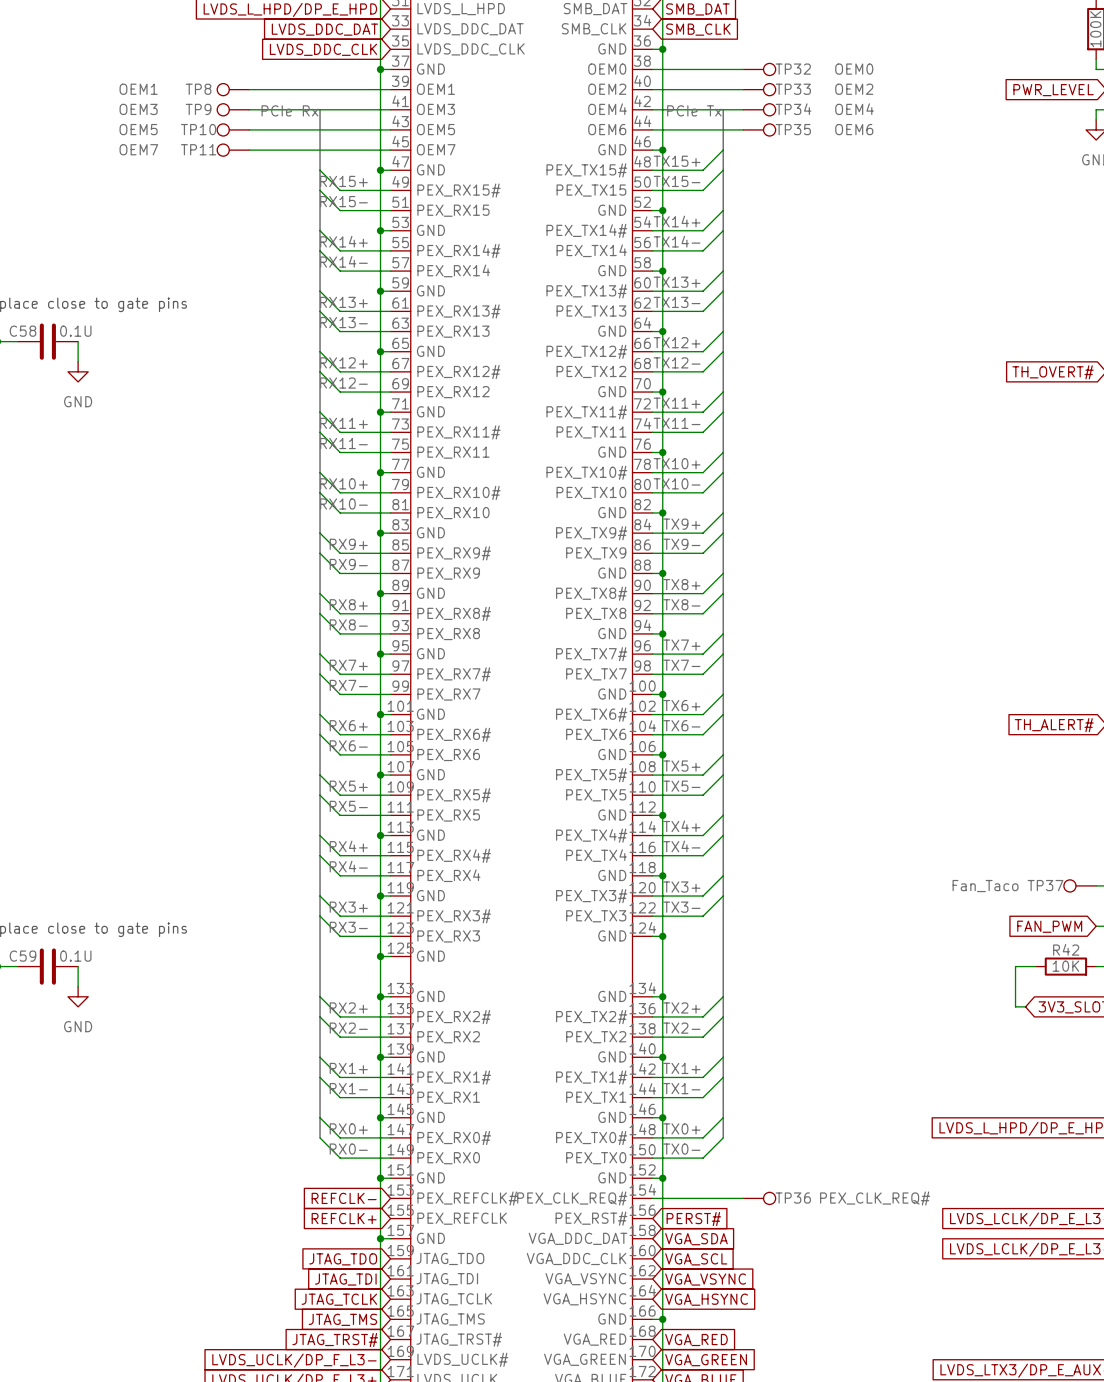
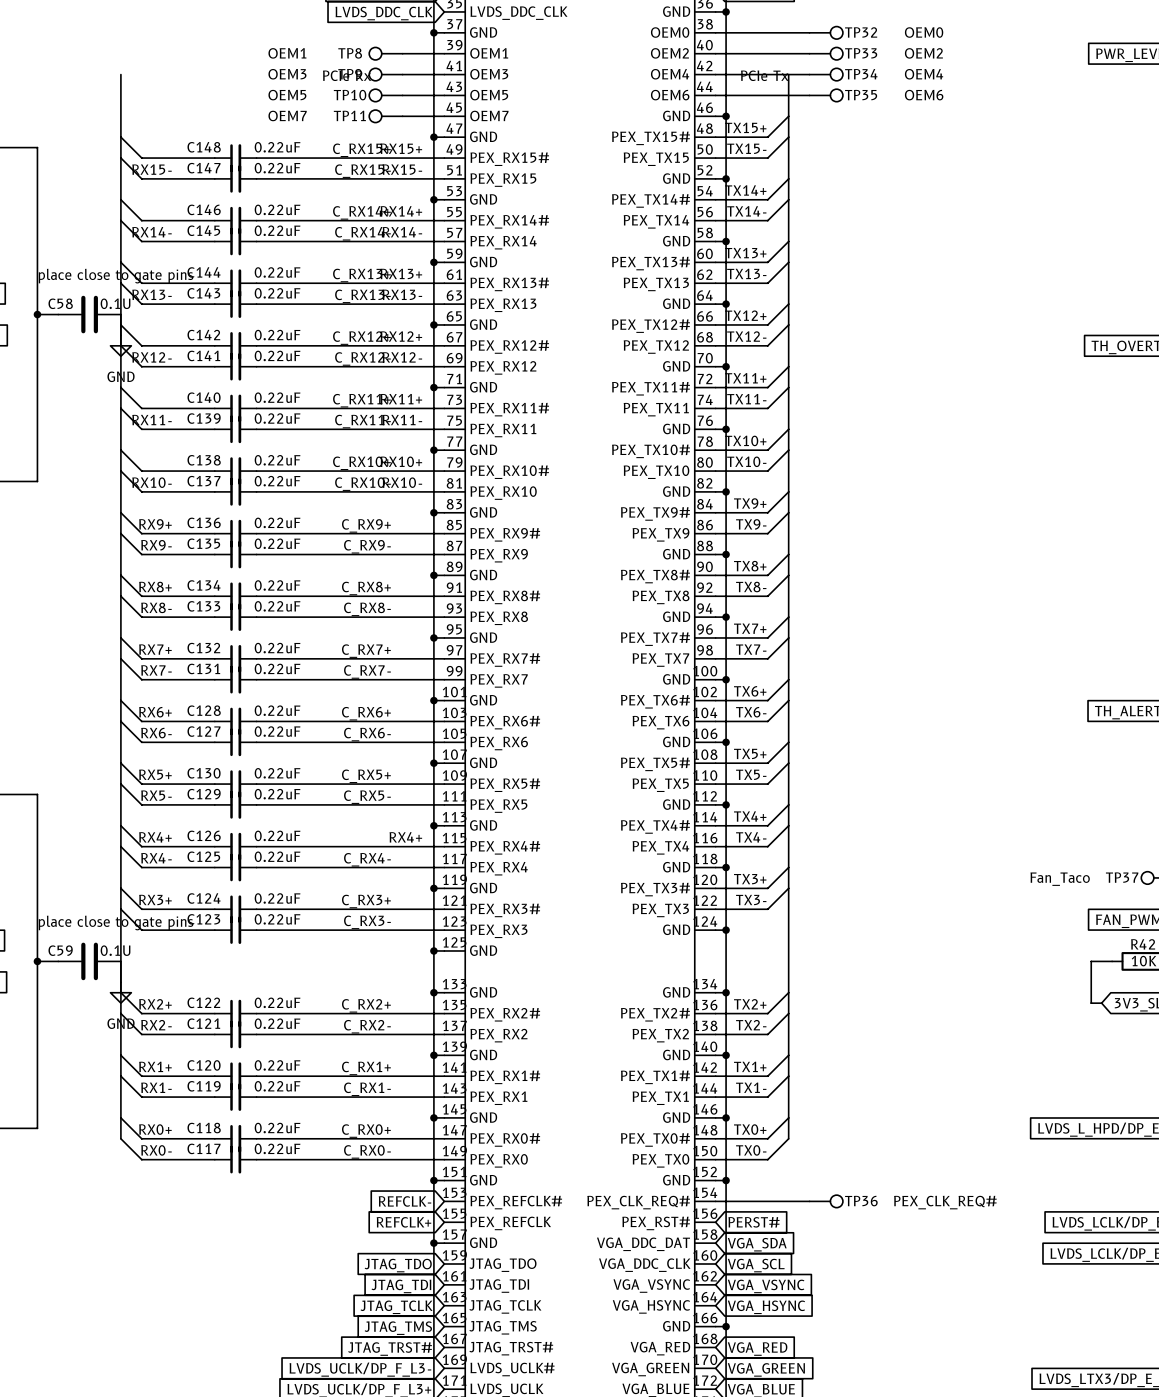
TP8 position: (233, 89) -> (385, 53)
wire: (249, 89) (350, 89) -> none
bus: none -> (120, 74) (120, 1138)
TP9 position: (233, 109) -> (385, 74)
wire: (249, 109) (350, 109) -> none
bus: (320, 109) (320, 1137) -> none
TP10 position: (233, 129) -> (385, 95)
wire: (249, 129) (350, 129) -> none
TP11 position: (233, 150) -> (385, 116)
wire: (249, 150) (350, 150) -> none
wire: none -> (120, 137) (141, 158) (214, 158)
wire: (320, 170) (340, 190) -> (256, 158) (392, 158)
label: none -> C_RX15+ (361, 150)
wire: none -> (120, 158) (141, 178) (214, 178)
C148: none -> 0.22uF (235, 158)
wire: (320, 190) (340, 210) -> (256, 178) (392, 178)
label: none -> RX15- (151, 169)
label: none -> C_RX15- (362, 171)
C147: none -> 0.22uF (235, 178)
wire: none -> (120, 199) (141, 220) (214, 220)
wire: (320, 230) (340, 250) -> (256, 220) (392, 220)
label: none -> C_RX14+ (361, 212)
wire: none -> (120, 220) (141, 241) (214, 241)
C146: none -> 0.22uF (235, 220)
wire: (320, 250) (340, 271) -> (256, 241) (392, 241)
label: none -> RX14- (151, 232)
label: none -> C_RX14- (362, 233)
C145: none -> 0.22uF (235, 241)
wire: none -> (120, 262) (141, 283) (214, 283)
wire: (320, 291) (340, 311) -> (256, 283) (392, 283)
label: none -> C_RX13+ (361, 275)
wire: none -> (120, 283) (141, 304) (214, 304)
C144: none -> 0.22uF (235, 283)
wire: (320, 311) (340, 331) -> (256, 304) (392, 304)
label: none -> RX13- (151, 294)
label: none -> C_RX13- (362, 296)
C143: none -> 0.22uF (235, 304)
wire: none -> (120, 324) (141, 345) (214, 345)
wire: (320, 351) (340, 371) -> (256, 345) (392, 345)
label: none -> C_RX12+ (361, 338)
wire: none -> (120, 345) (141, 366) (214, 366)
C142: none -> 0.22uF (235, 345)
wire: (320, 371) (340, 392) -> (256, 366) (392, 366)
label: none -> RX12- (151, 357)
label: none -> C_RX12- (362, 358)
C141: none -> 0.22uF (235, 366)
wire: none -> (120, 387) (141, 408) (214, 408)
wire: (320, 412) (340, 432) -> (256, 408) (392, 408)
label: none -> C_RX11+ (361, 400)
wire: none -> (120, 408) (141, 429) (214, 429)
C140: none -> 0.22uF (235, 408)
wire: (320, 432) (340, 452) -> (256, 429) (392, 429)
label: none -> RX11- (151, 420)
label: none -> C_RX11- (362, 421)
C139: none -> 0.22uF (235, 429)
wire: none -> (120, 450) (141, 471) (214, 471)
wire: (320, 472) (340, 492) -> (256, 471) (392, 471)
label: none -> C_RX10+ (361, 463)
wire: none -> (120, 471) (141, 491) (214, 491)
C138: none -> 0.22uF (235, 471)
wire: (320, 492) (340, 512) -> (256, 491) (392, 491)
label: none -> RX10- (151, 482)
label: none -> C_RX10- (362, 484)
C137: none -> 0.22uF (235, 491)
wire: none -> (120, 512) (141, 533) (214, 533)
wire: (320, 533) (340, 553) -> (256, 533) (392, 533)
label: none -> RX9+ (155, 524)
label: RX9+ (348, 544) -> C_RX9+ (366, 525)
wire: none -> (120, 533) (141, 554) (214, 554)
C136: none -> 0.22uF (235, 533)
wire: (320, 553) (340, 573) -> (256, 554) (392, 554)
label: none -> RX9- (156, 545)
label: RX9- (348, 564) -> C_RX9- (367, 546)
C135: none -> 0.22uF (235, 554)
wire: none -> (120, 575) (141, 596) (214, 596)
wire: (320, 593) (340, 613) -> (256, 596) (392, 596)
label: none -> RX8+ (155, 586)
label: RX8+ (348, 604) -> C_RX8+ (366, 588)
wire: none -> (120, 596) (141, 617) (214, 617)
C134: none -> 0.22uF (235, 596)
wire: (320, 613) (340, 633) -> (256, 617) (392, 617)
label: none -> RX8- (156, 607)
label: RX8- (348, 624) -> C_RX8- (367, 609)
C133: none -> 0.22uF (235, 617)
wire: none -> (120, 637) (141, 658) (214, 658)
wire: (320, 654) (340, 674) -> (256, 658) (392, 658)
label: none -> RX7+ (155, 649)
label: RX7+ (348, 665) -> C_RX7+ (366, 651)
wire: none -> (120, 658) (141, 679) (214, 679)
C132: none -> 0.22uF (235, 658)
wire: (320, 674) (340, 694) -> (256, 679) (392, 679)
label: none -> RX7- (156, 670)
label: RX7- (348, 685) -> C_RX7- (367, 671)
C131: none -> 0.22uF (235, 679)
wire: none -> (120, 700) (141, 721) (214, 721)
wire: (320, 714) (340, 734) -> (256, 721) (392, 721)
label: none -> RX6+ (155, 712)
label: RX6+ (348, 725) -> C_RX6+ (366, 713)
wire: none -> (120, 721) (141, 742) (214, 742)
C128: none -> 0.22uF (235, 721)
wire: (320, 734) (340, 754) -> (256, 742) (392, 742)
label: none -> RX6- (156, 733)
label: RX6- (348, 745) -> C_RX6- (367, 734)
C127: none -> 0.22uF (235, 742)
wire: none -> (120, 763) (141, 784) (214, 784)
wire: (320, 775) (340, 795) -> (256, 784) (392, 784)
label: none -> RX5+ (155, 774)
label: RX5+ (348, 786) -> C_RX5+ (366, 776)
wire: none -> (120, 784) (141, 804) (214, 804)
C130: none -> 0.22uF (235, 784)
wire: (320, 795) (340, 815) -> (256, 804) (392, 804)
label: none -> RX5- (156, 795)
label: RX5- (348, 806) -> C_RX5- (367, 797)
C129: none -> 0.22uF (235, 804)
wire: none -> (120, 825) (141, 846) (214, 846)
wire: (320, 835) (340, 855) -> (256, 846) (392, 846)
label: none -> RX4+ (155, 837)
wire: none -> (120, 846) (141, 867) (214, 867)
C126: none -> 0.22uF (235, 846)
wire: (320, 855) (340, 875) -> (256, 867) (392, 867)
label: none -> RX4- (156, 858)
label: RX4- (348, 866) -> C_RX4- (367, 859)
C125: none -> 0.22uF (235, 867)
wire: none -> (120, 888) (141, 909) (214, 909)
wire: (320, 896) (340, 916) -> (256, 909) (392, 909)
label: none -> RX3+ (155, 899)
label: RX3+ (348, 907) -> C_RX3+ (366, 901)
wire: none -> (120, 909) (141, 930) (214, 930)
C124: none -> 0.22uF (235, 909)
wire: (320, 916) (340, 936) -> (256, 930) (392, 930)
label: RX3- (348, 927) -> C_RX3- (367, 922)
C123: none -> 0.22uF (235, 930)
wire: none -> (120, 992) (141, 1013) (214, 1013)
wire: (320, 996) (340, 1016) -> (256, 1013) (392, 1013)
label: none -> RX2+ (155, 1004)
label: RX2+ (348, 1007) -> C_RX2+ (366, 1005)
wire: none -> (120, 1013) (141, 1034) (214, 1034)
C122: none -> 0.22uF (235, 1013)
wire: (320, 1016) (340, 1037) -> (256, 1034) (392, 1034)
label: none -> RX2- (156, 1025)
label: RX2- (348, 1028) -> C_RX2- (367, 1026)
C121: none -> 0.22uF (235, 1034)
wire: none -> (120, 1055) (141, 1076) (214, 1076)
wire: (320, 1057) (340, 1077) -> (256, 1076) (392, 1076)
label: none -> RX1+ (155, 1066)
label: RX1+ (348, 1068) -> C_RX1+ (366, 1068)
wire: none -> (120, 1076) (141, 1097) (214, 1097)
C120: none -> 0.22uF (235, 1076)
wire: (320, 1077) (340, 1097) -> (256, 1097) (392, 1097)
label: none -> RX1- (156, 1087)
label: RX1- (348, 1088) -> C_RX1- (367, 1089)
C119: none -> 0.22uF (235, 1097)
wire: none -> (120, 1117) (141, 1138) (214, 1138)
wire: (320, 1117) (340, 1137) -> (256, 1138) (392, 1138)
label: none -> RX0+ (155, 1129)
label: RX0+ (348, 1128) -> C_RX0+ (366, 1131)
wire: none -> (120, 1138) (141, 1159) (214, 1159)
C118: none -> 0.22uF (235, 1138)
wire: (320, 1137) (340, 1158) -> (256, 1159) (392, 1159)
label: none -> RX0- (156, 1150)
label: RX0- (348, 1149) -> C_RX0- (367, 1151)
C117: none -> 0.22uF (235, 1159)

